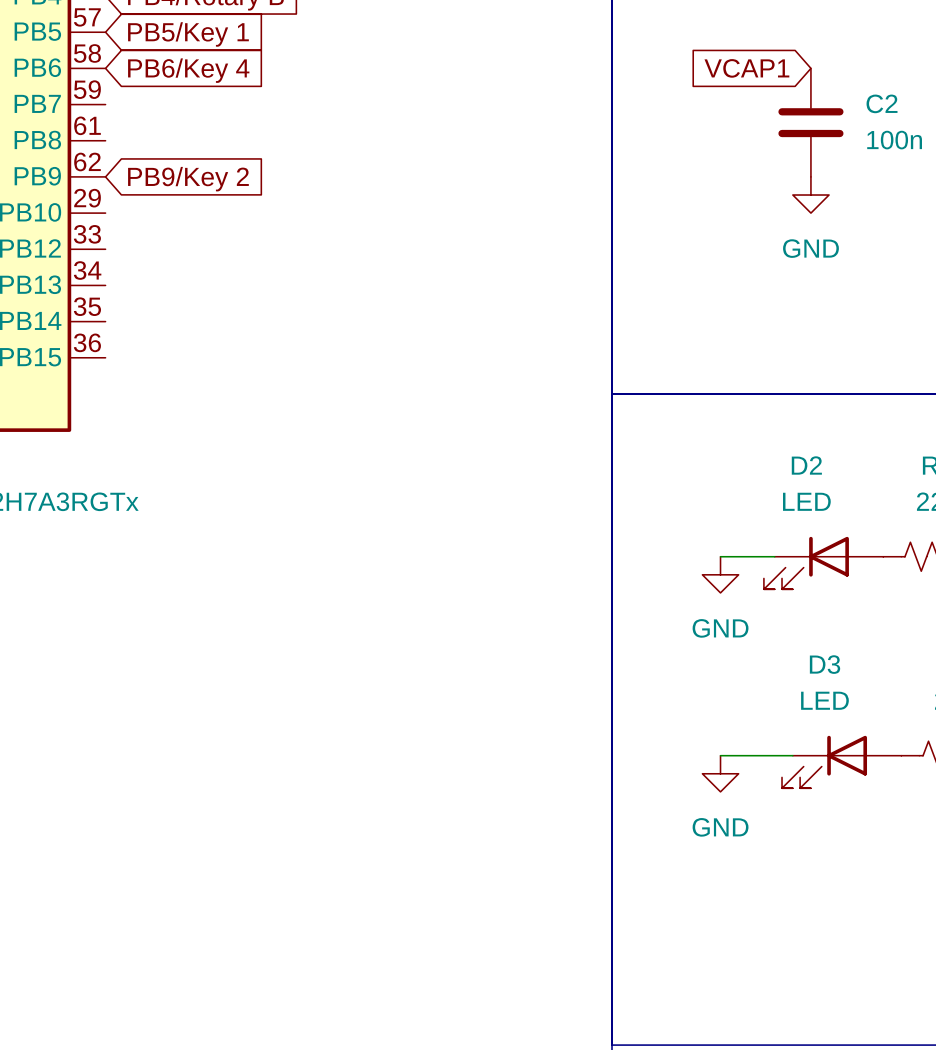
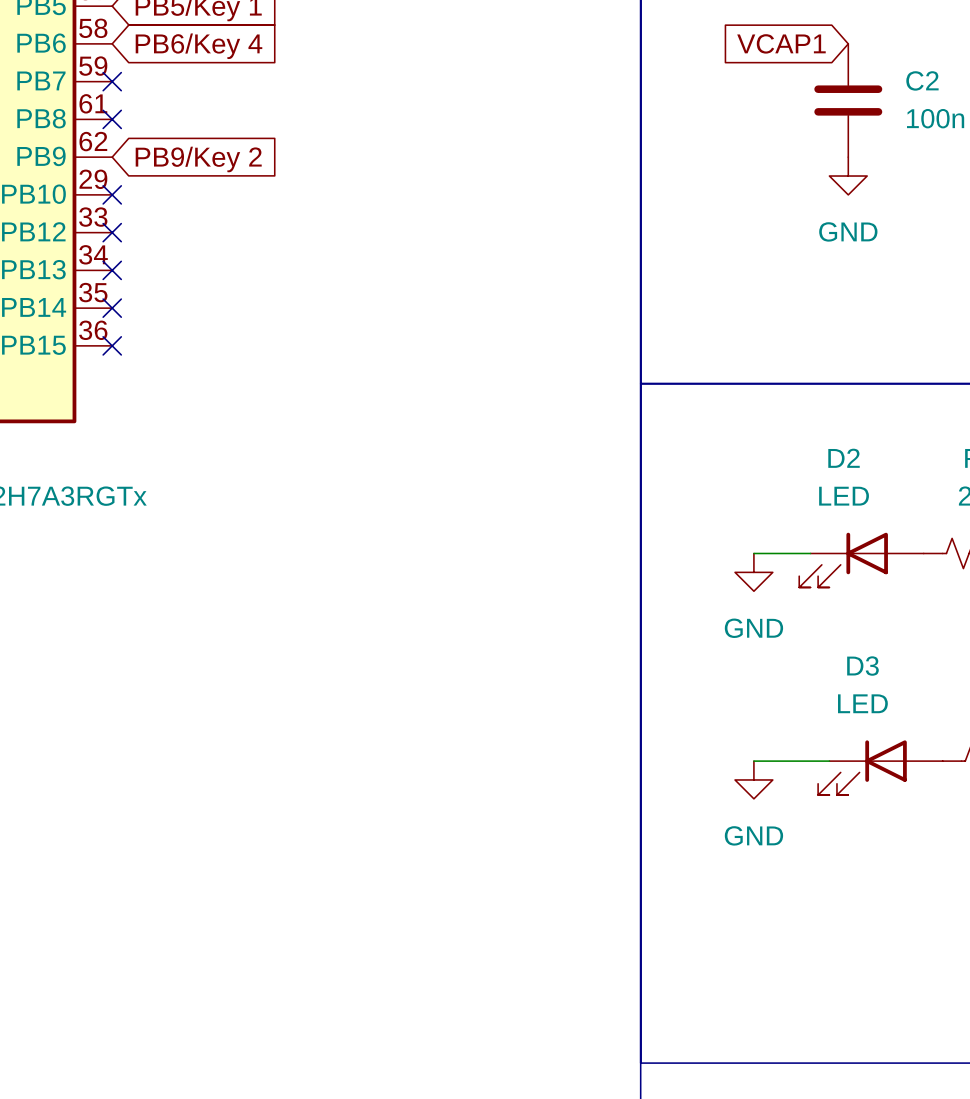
no-connect mark: none -> (112, 81)
no-connect mark: none -> (112, 119)
no-connect mark: none -> (112, 194)
no-connect mark: none -> (112, 232)
no-connect mark: none -> (112, 270)
no-connect mark: none -> (112, 308)
no-connect mark: none -> (112, 345)

